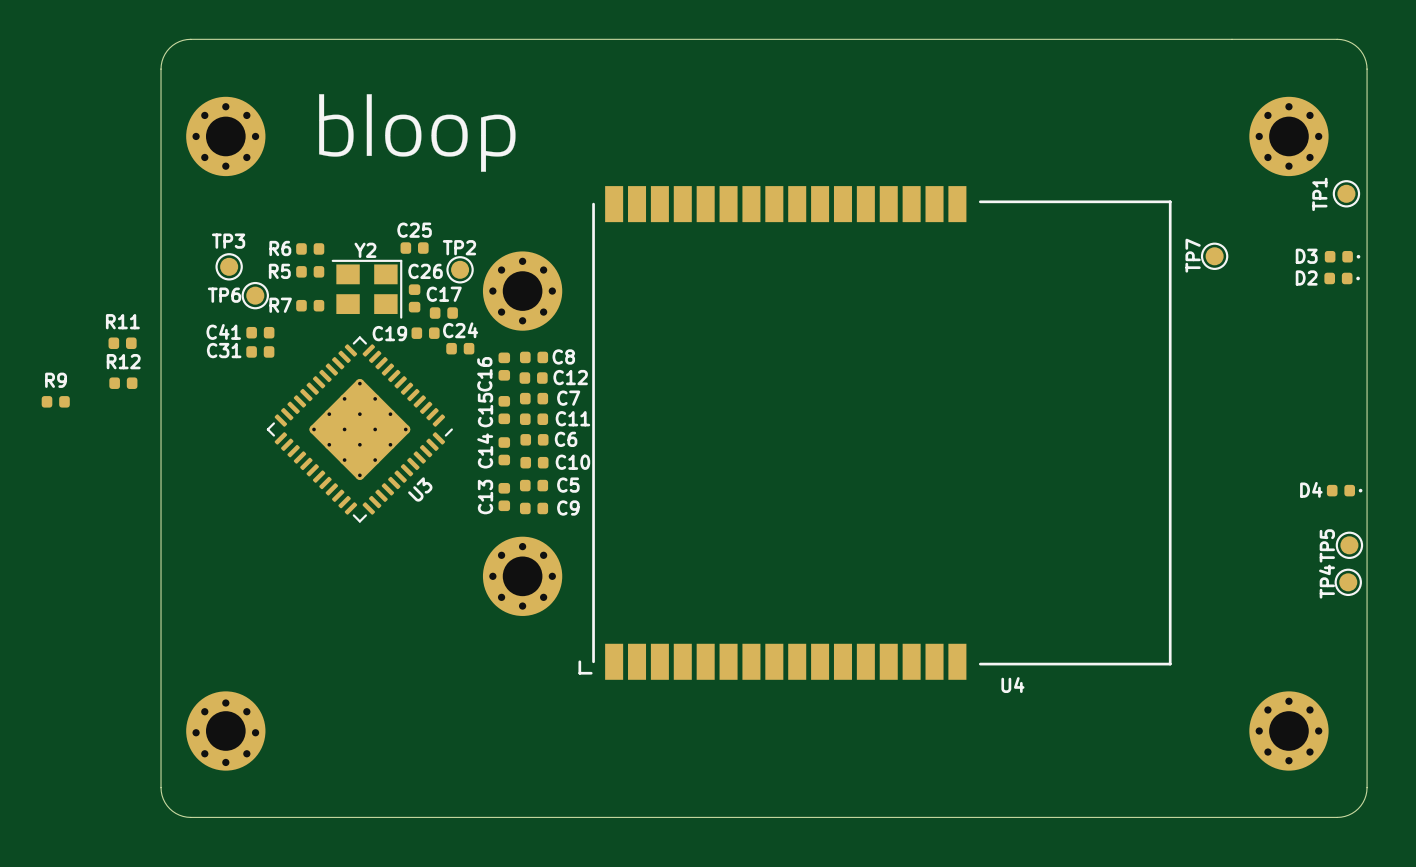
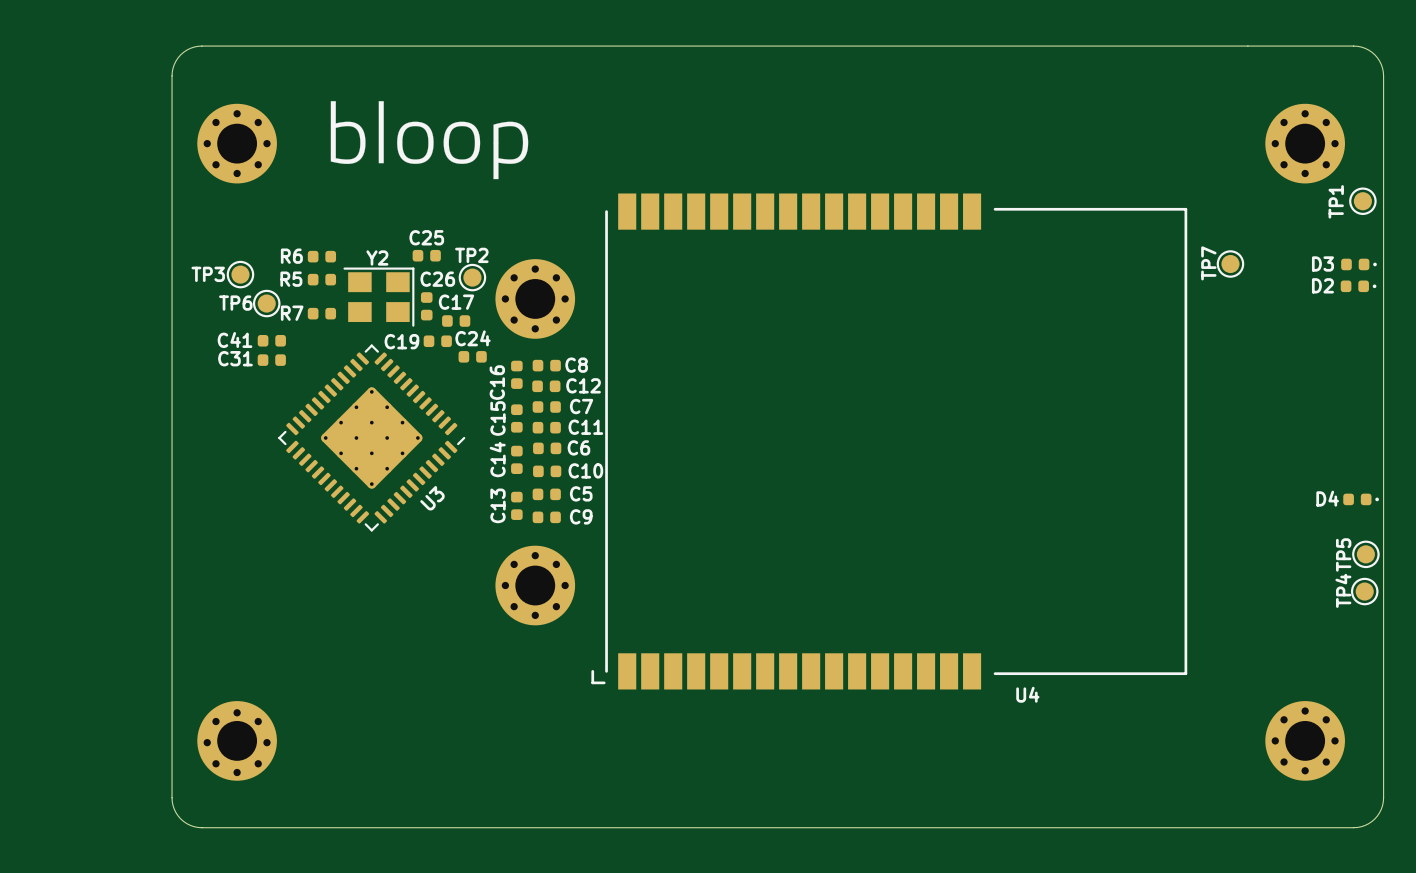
TP3 name position: TP3 (228, 241) -> TP3 (208, 274)
R11: (122, 343) -> none
R12: (123, 383) -> none
R9: (55, 401) -> none

